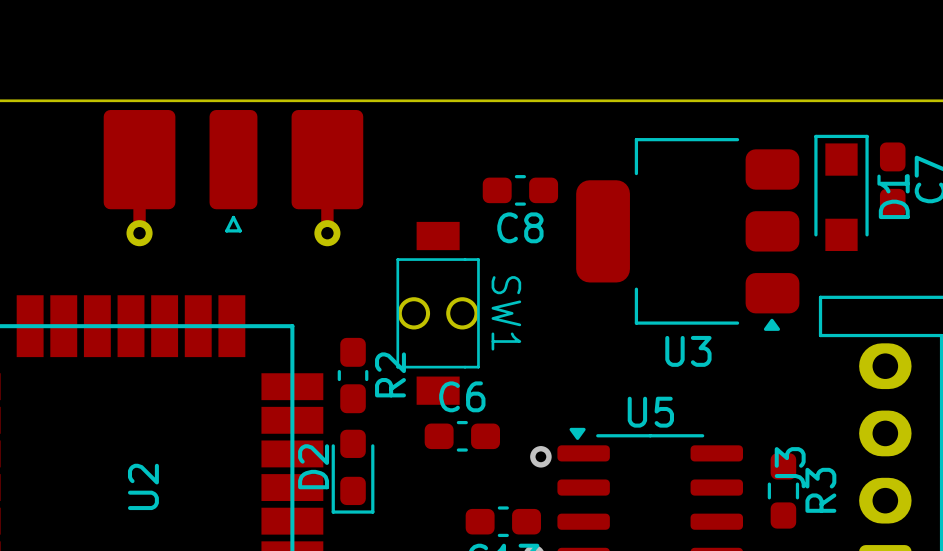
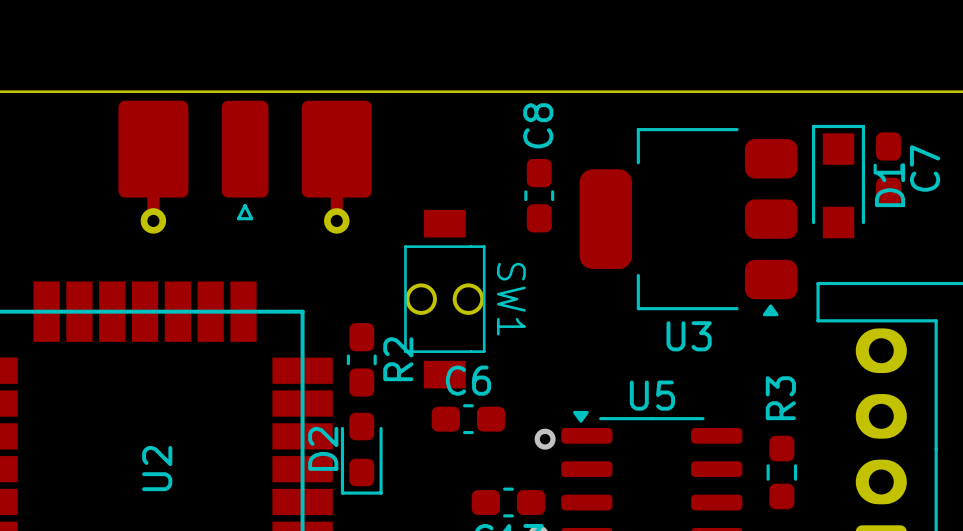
C8 rotation: 0° (520, 190) -> 90° clockwise (539, 195)
C8 name position: C8 (520, 227) -> C8 (538, 125)
J3 name: J3 (790, 467) -> none
R3 name position: R3 (820, 490) -> R3 (780, 398)

